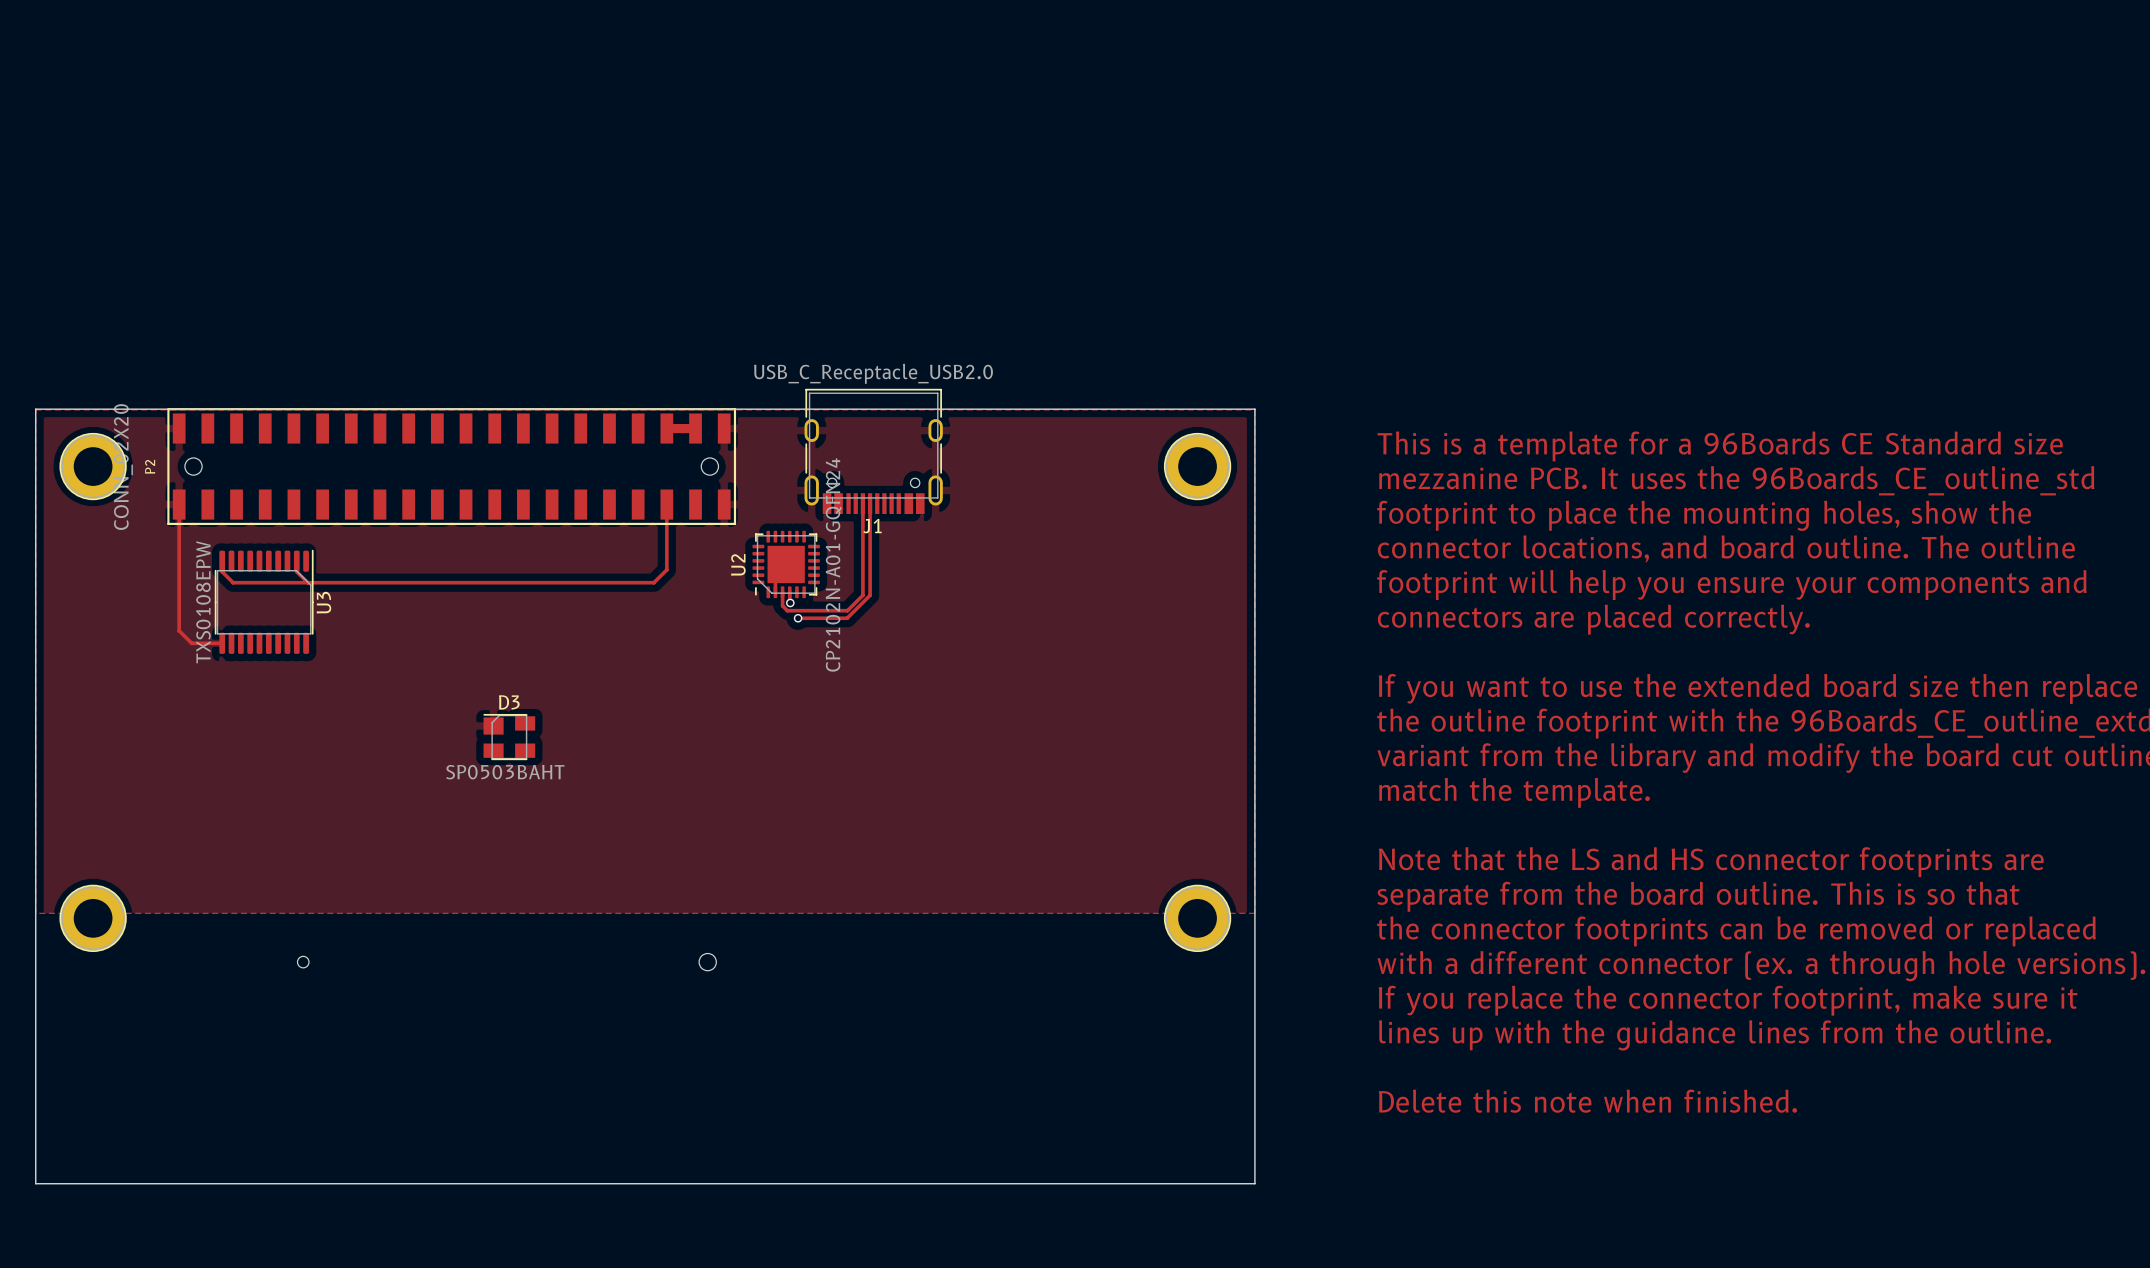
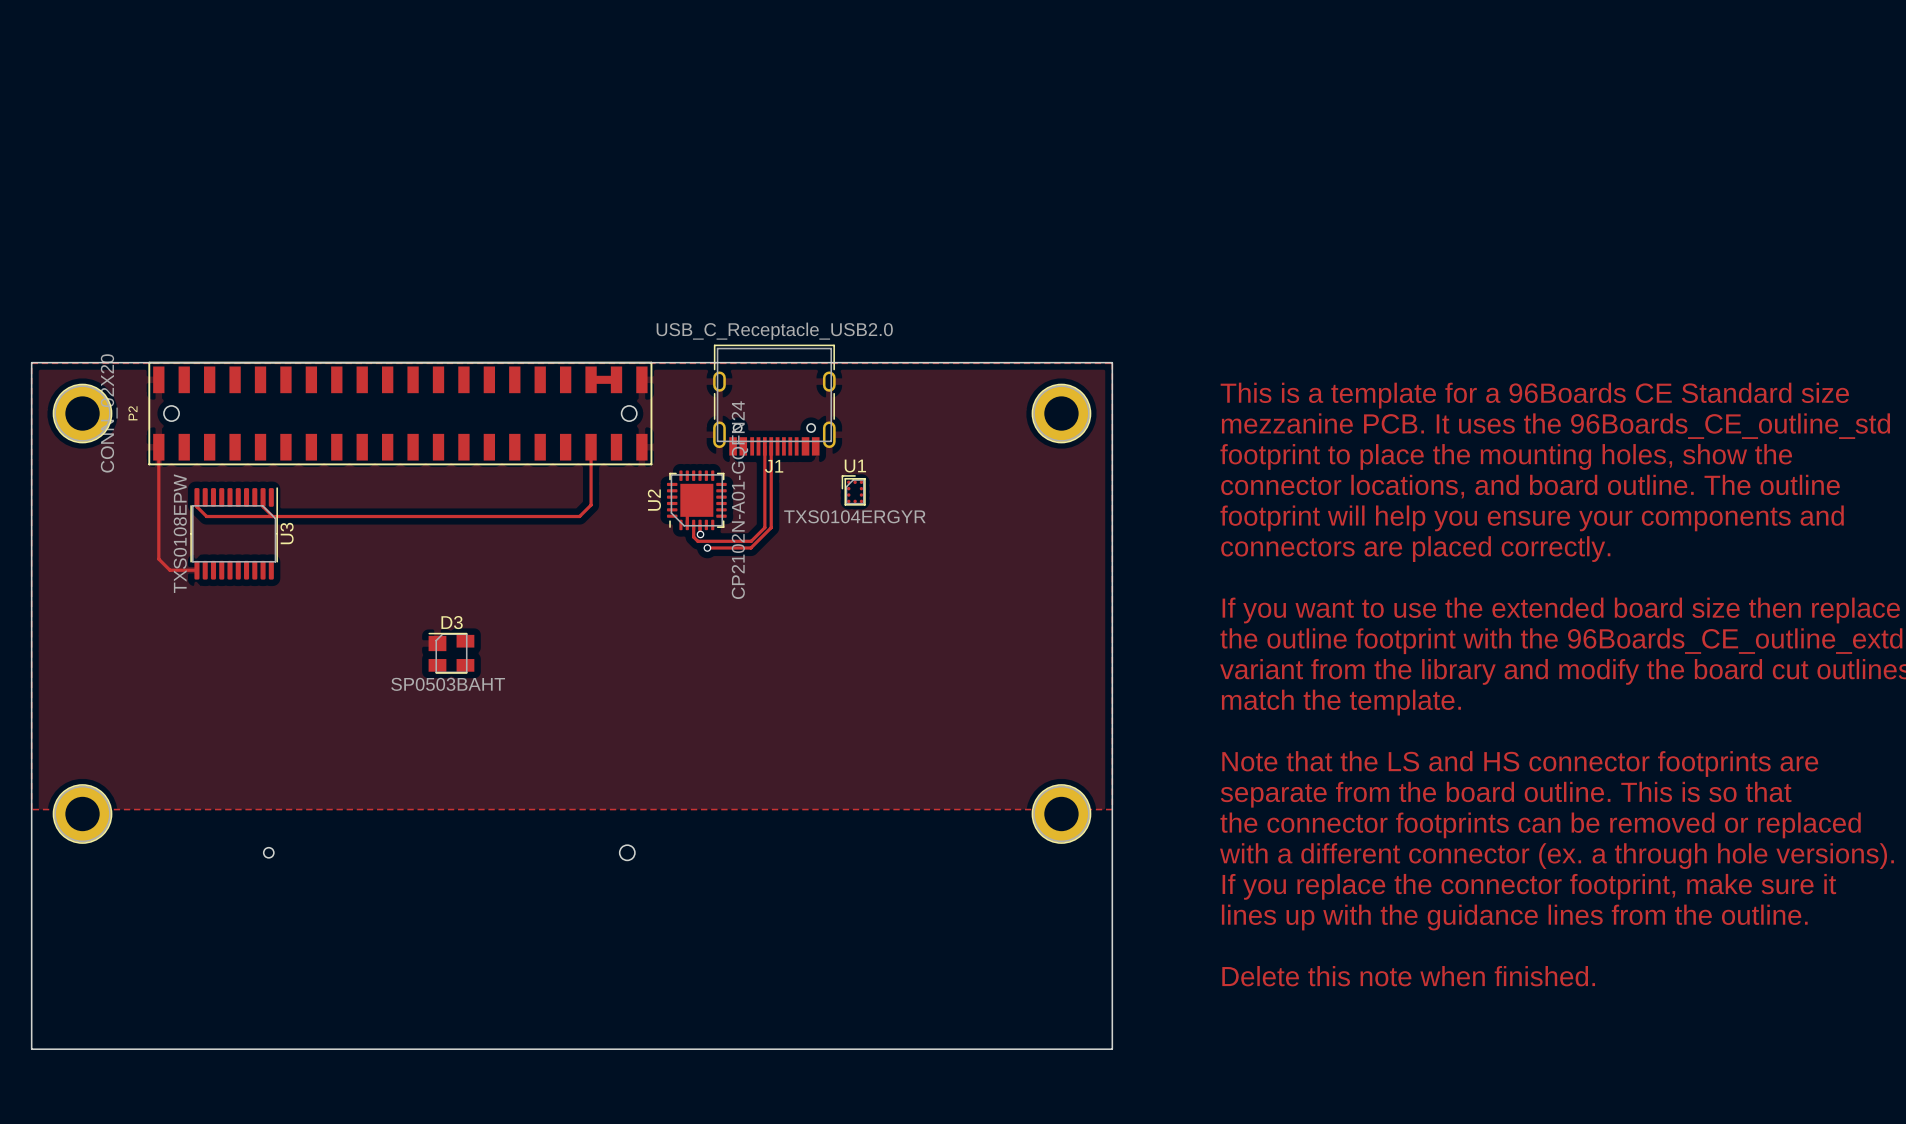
U1: none -> TXS0104ERGYR (853, 490)

